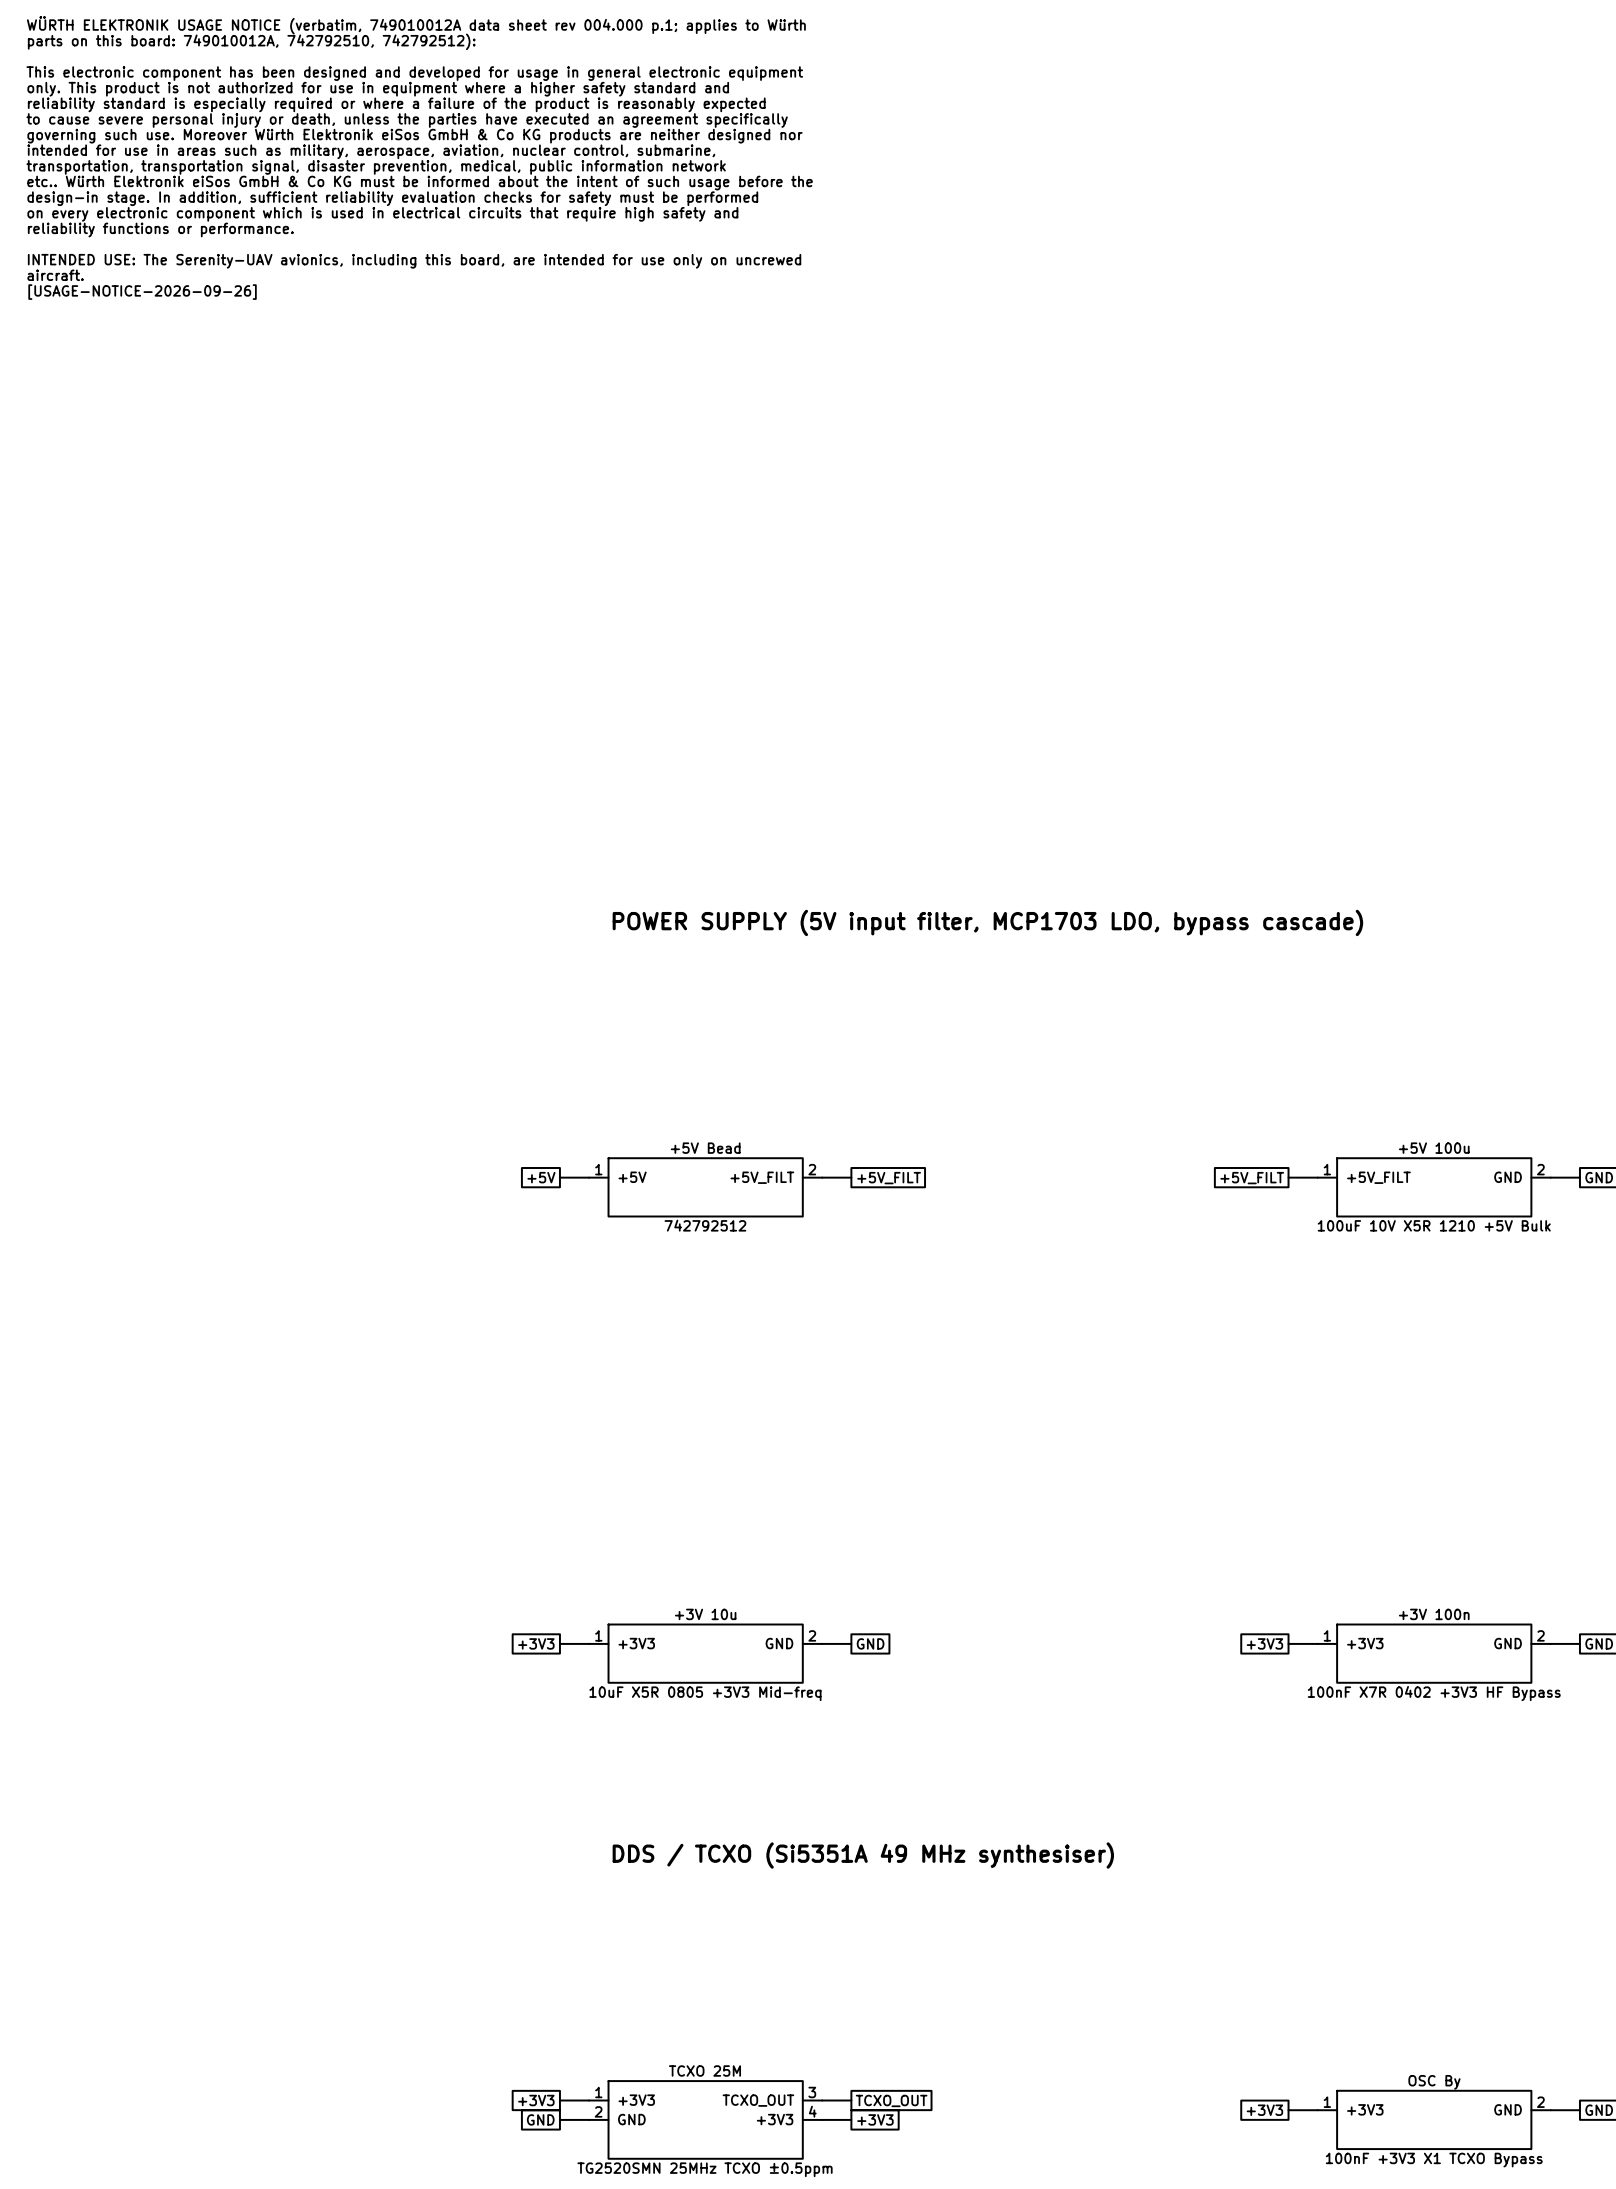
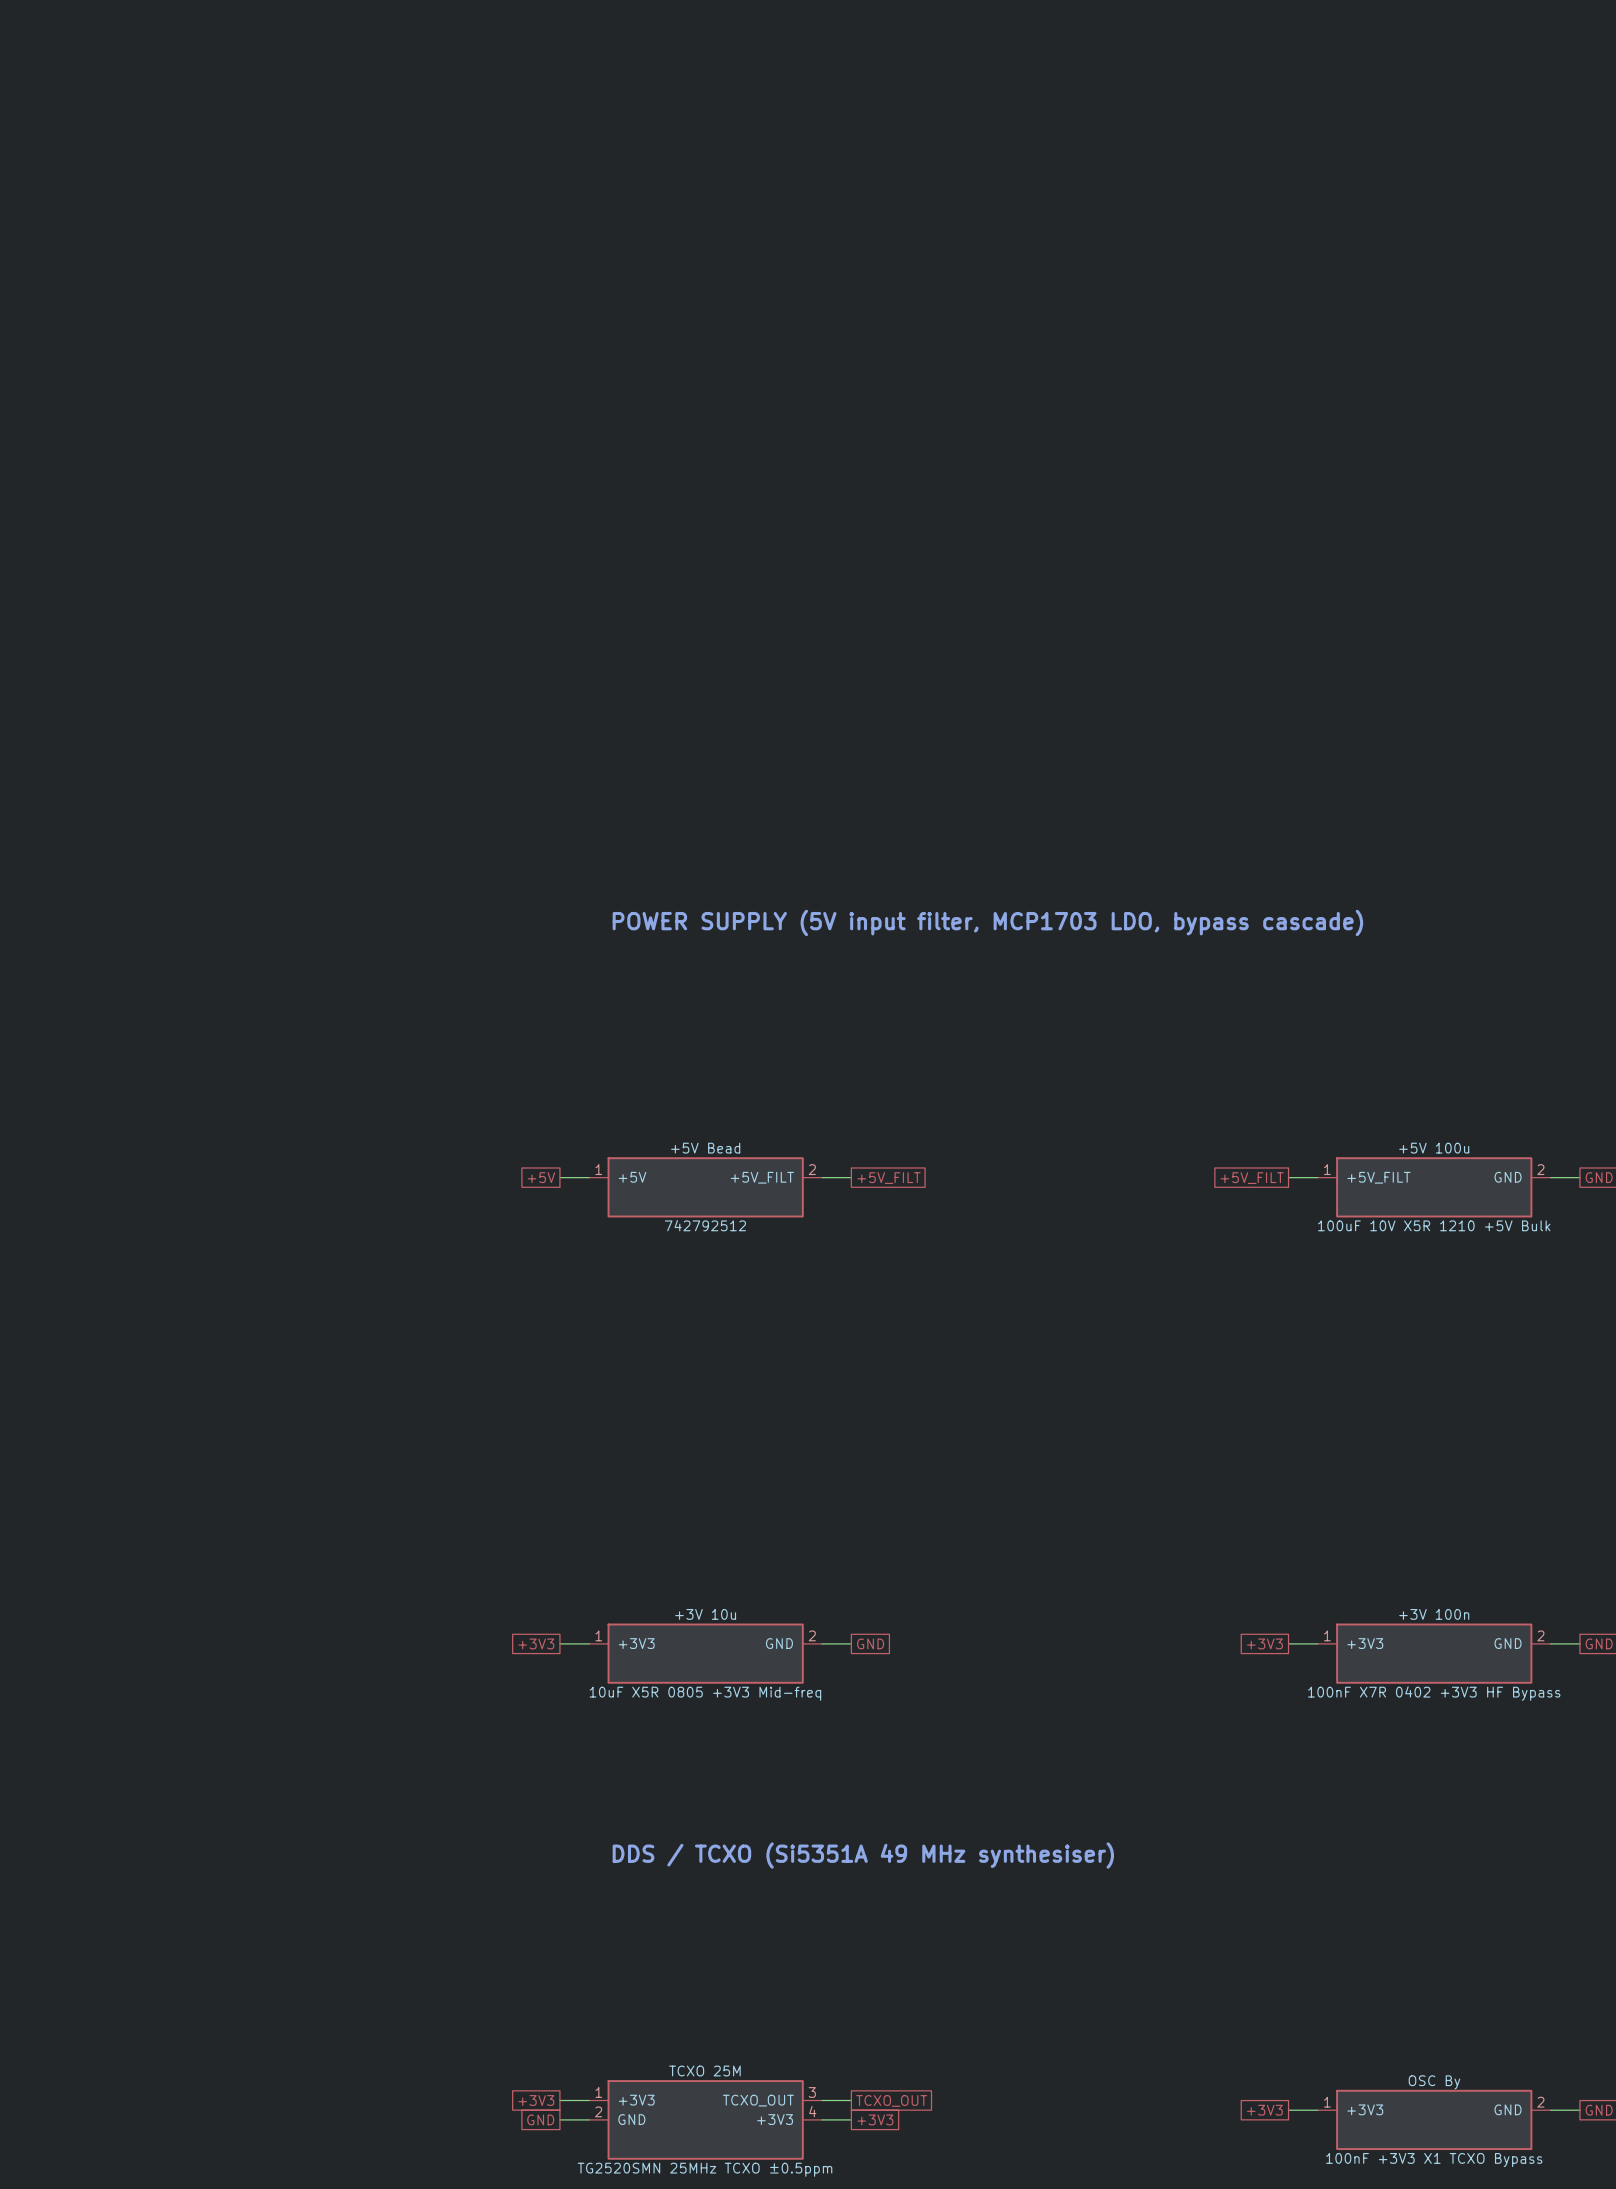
text: WÜRTH ELEKTRONIK USAGE NOTICE (verbatim, 749010012A data sheet rev 004.000 p.1; applies to Würth (416, 25) -> none
text: parts on this board: 749010012A, 742792510, 742792512): (251, 41) -> none
text: This electronic component has been designed and developed for usage in general electronic equipment (414, 73) -> none
text: only. This product is not authorized for use in equipment where a higher safety standard and (378, 89) -> none
text: reliability standard is especially required or where a failure of the product is reasonably expected (396, 104) -> none
text: to cause severe personal injury or death, unless the parties have executed an agreement specifically (407, 120) -> none
text: governing such use. Moreover Würth Elektronik eiSos GmbH & Co KG products are neither designed nor (415, 136) -> none
text: intended for use in areas such as military, aerospace, aviation, nuclear control, submarine, (371, 151) -> none
text: transportation, transportation signal, disaster prevention, medical, public information network (376, 167) -> none
text: etc.. Würth Elektronik eiSos GmbH & Co KG must be informed about the intent of such usage before the (420, 183) -> none
text: design-in stage. In addition, sufficient reliability evaluation checks for safety must be performed (392, 198) -> none
text: on every electronic component which is used in electrical circuits that require high safety and (382, 214) -> none
text: reliability functions or performance. (160, 229) -> none
text: INTENDED USE: The Serenity-UAV avionics, including this board, are intended for use only on uncrewed (414, 261) -> none
text: aircraft. (55, 275) -> none
text: [USAGE-NOTICE-2026-09-26] (142, 292) -> none

